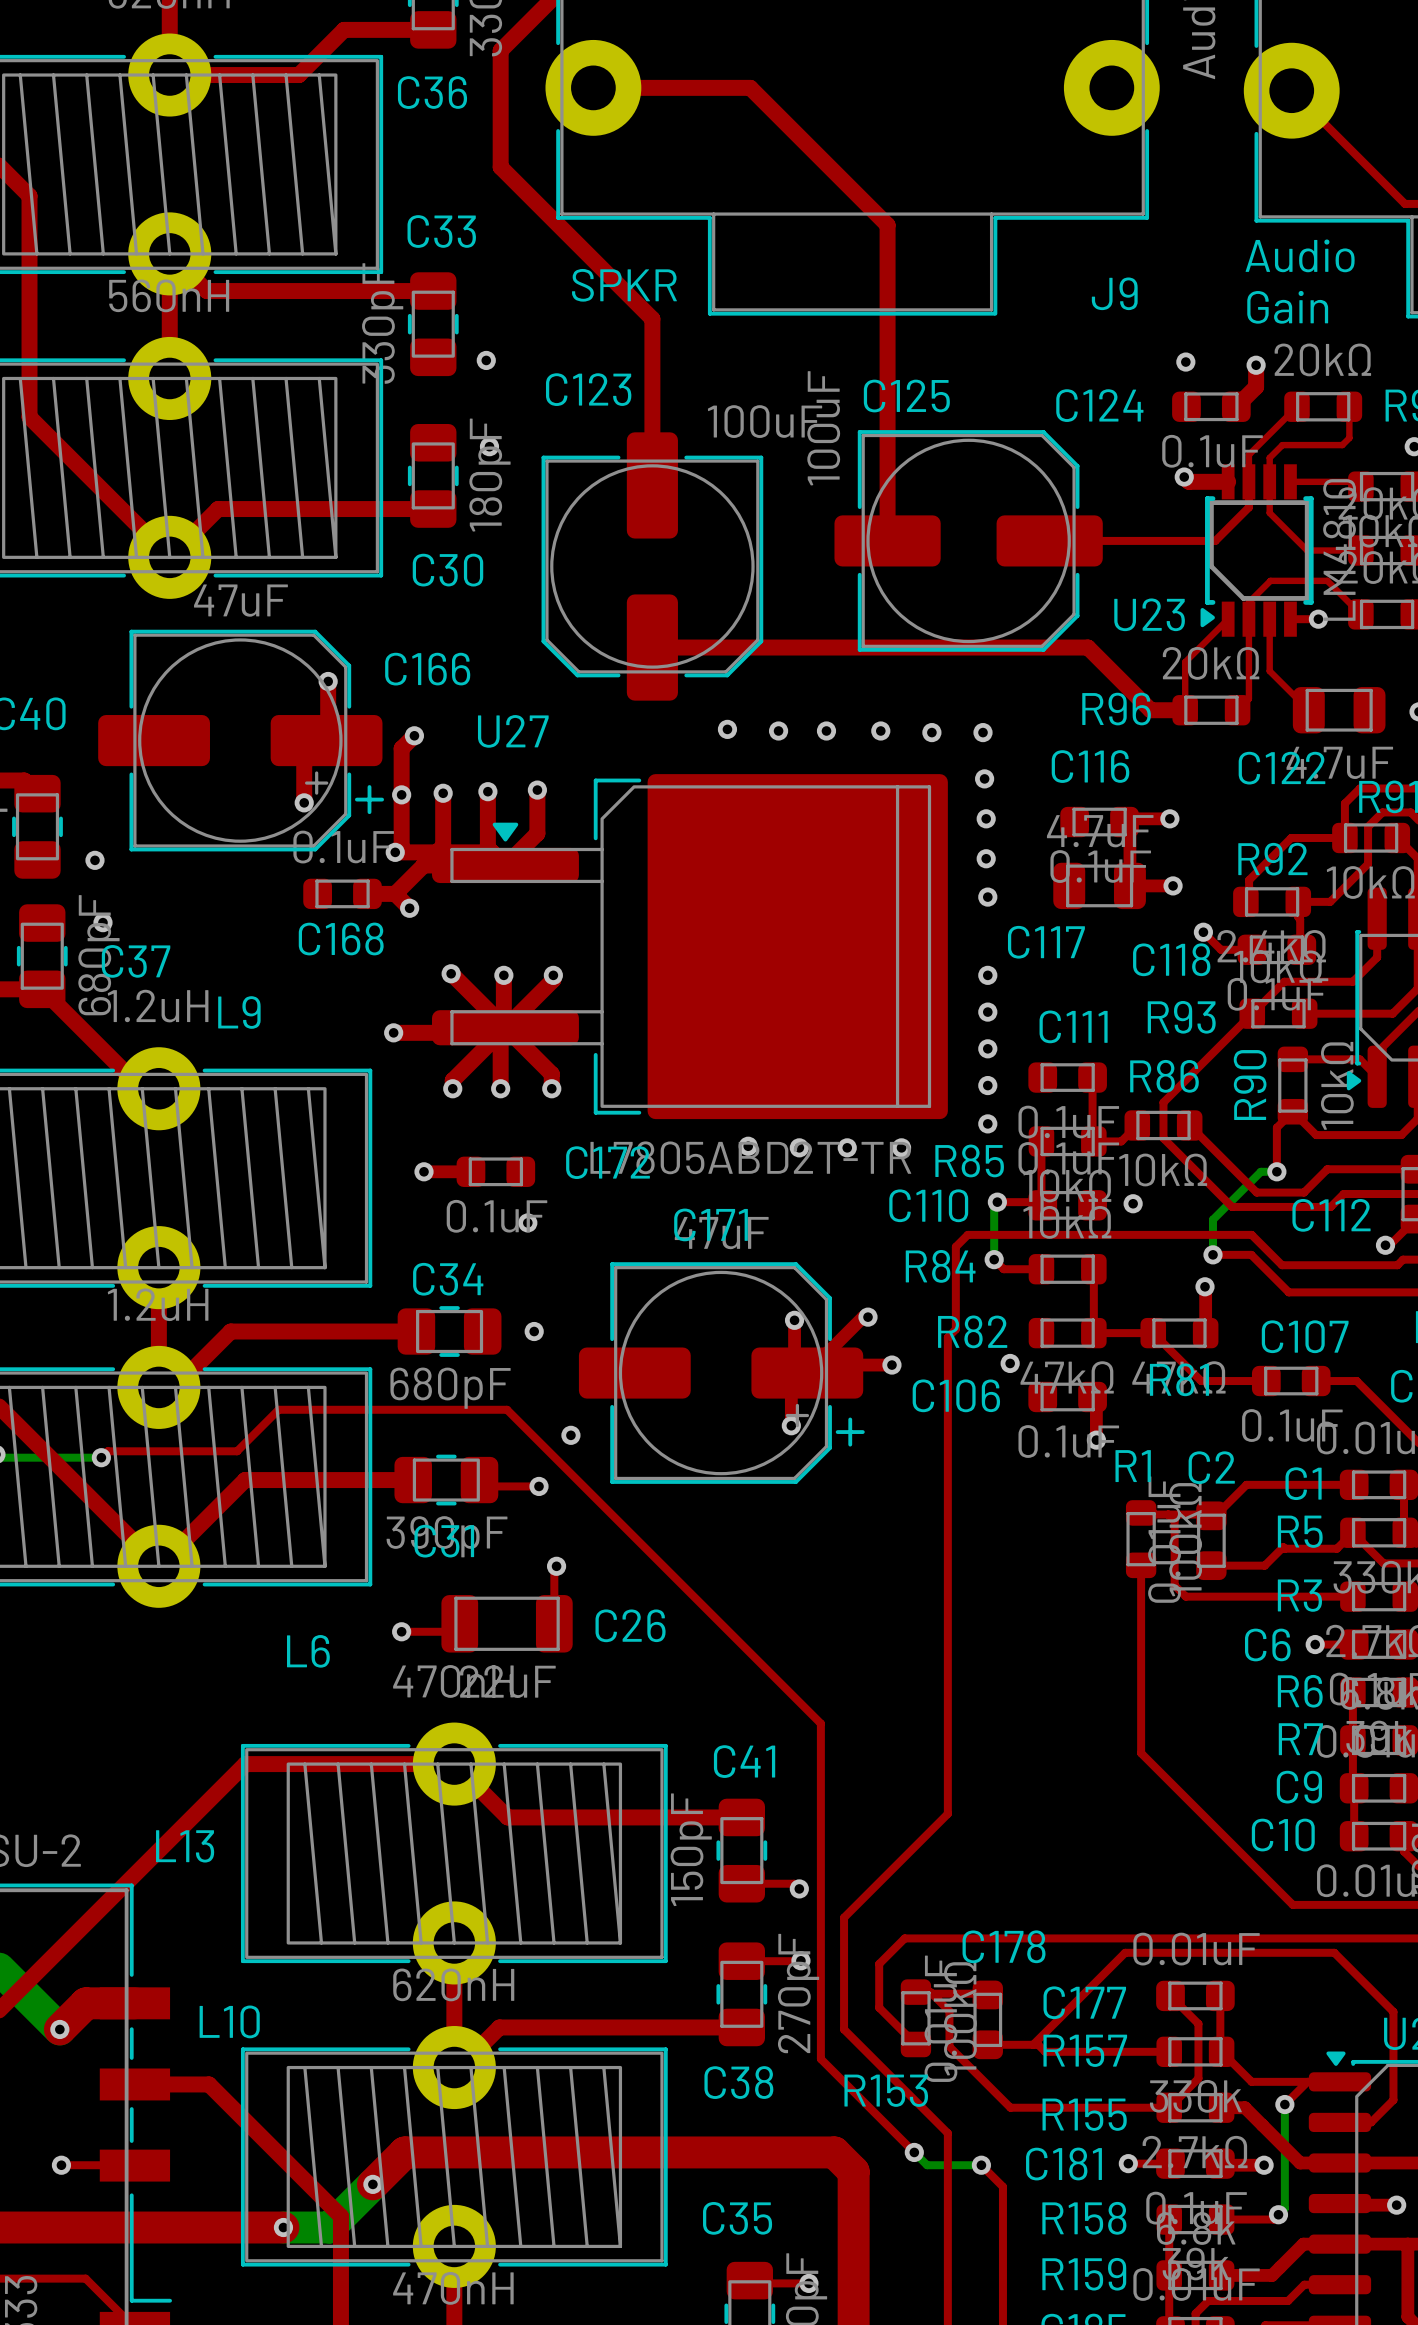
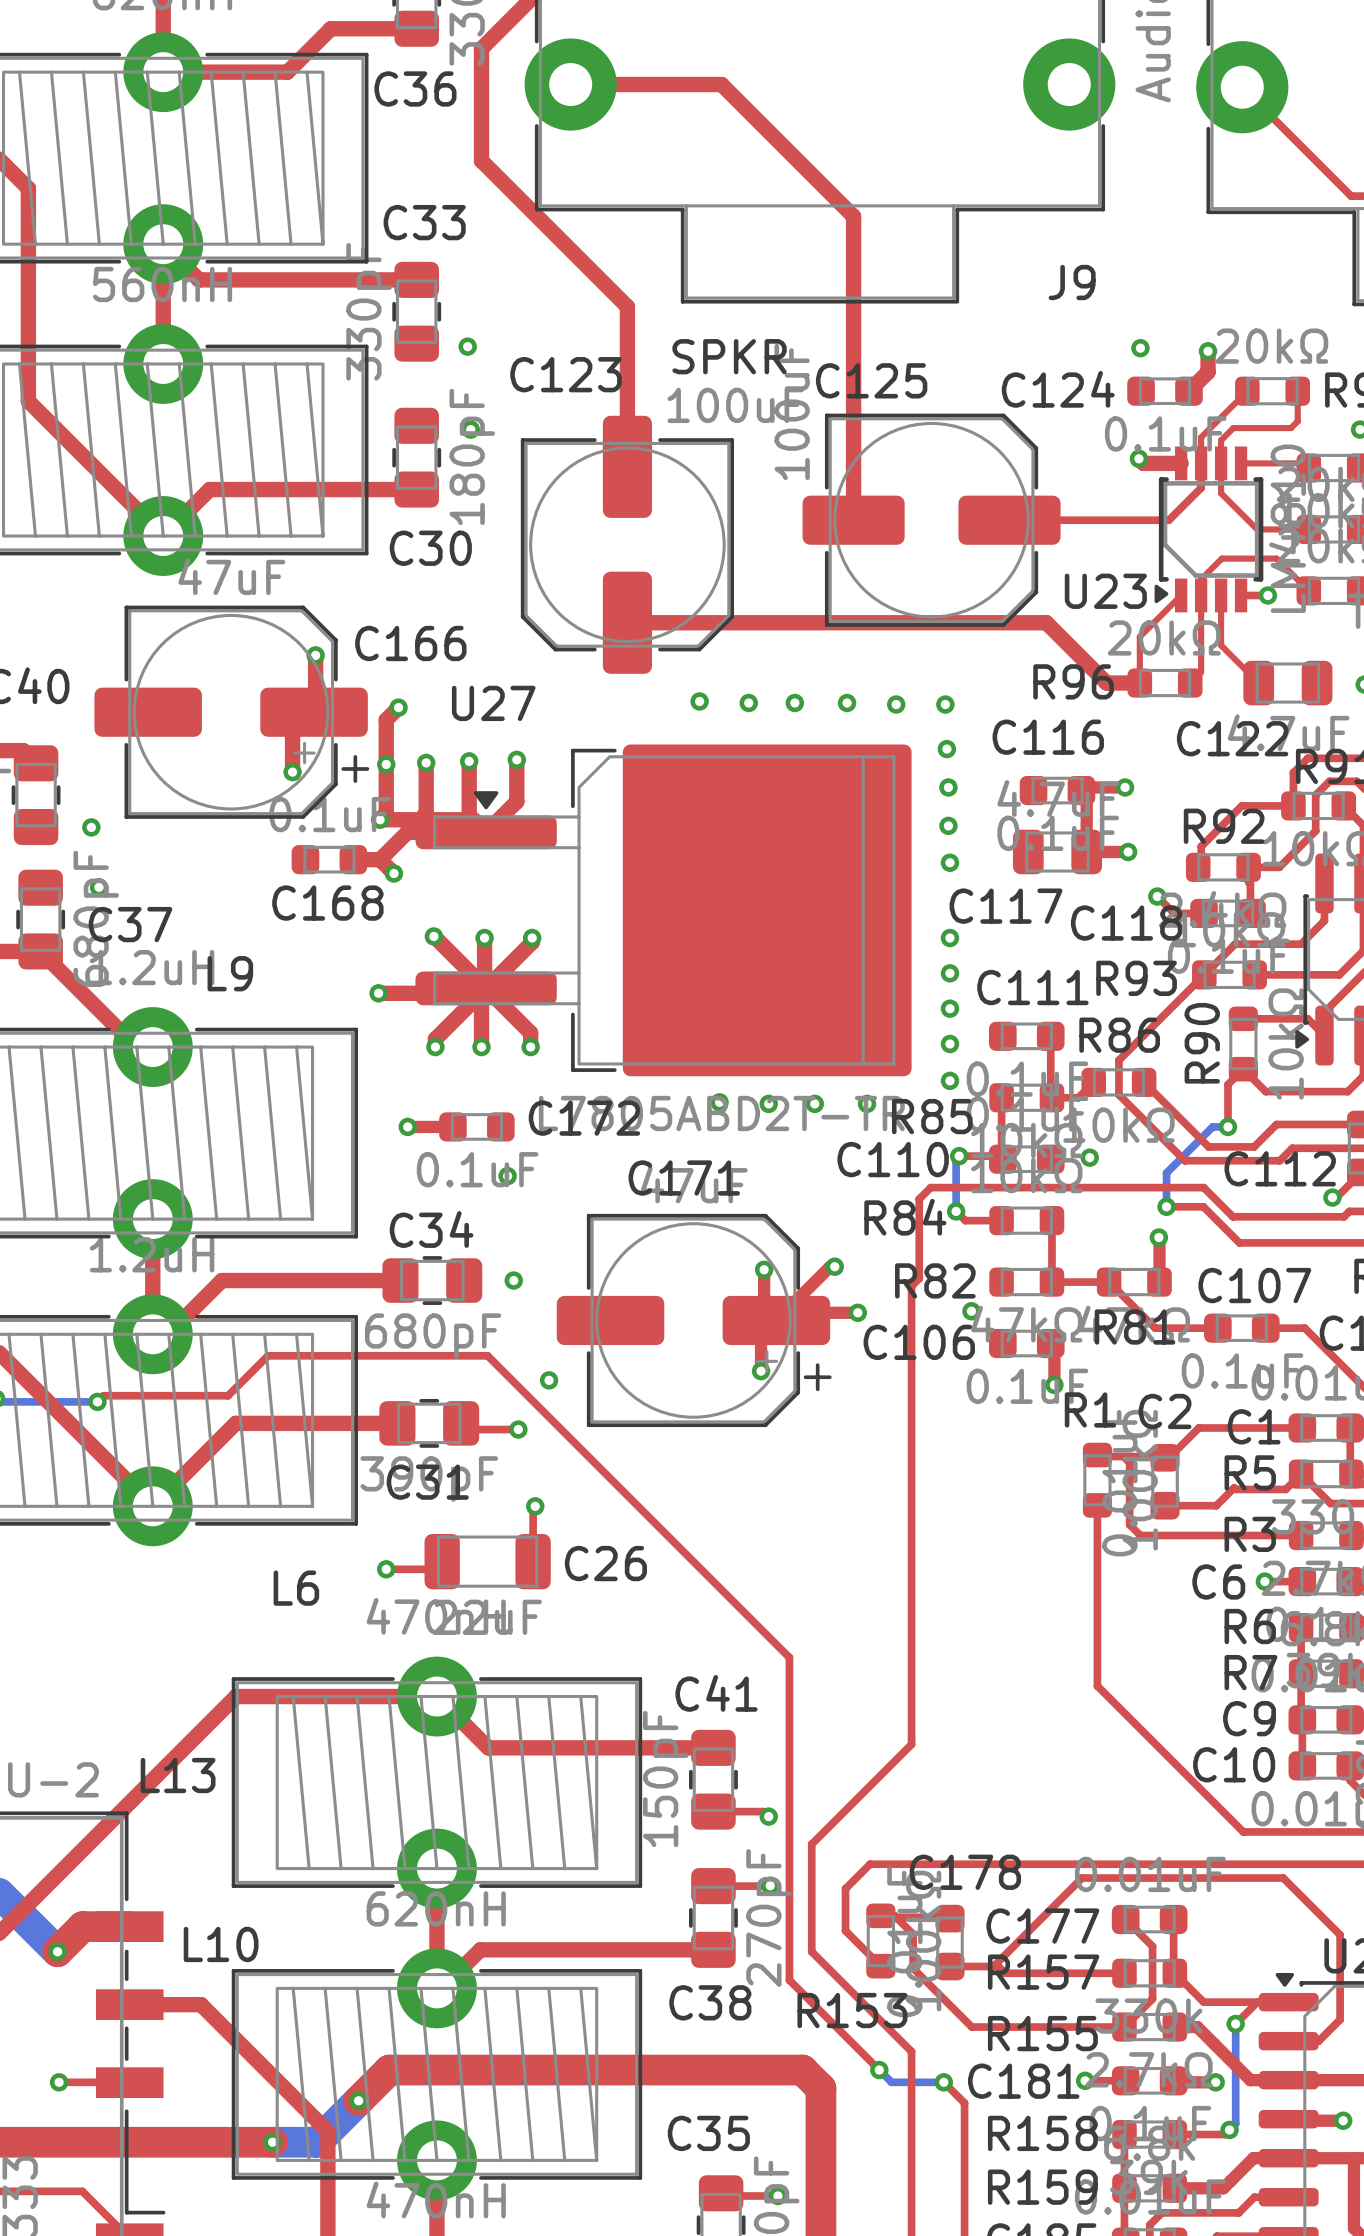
text: Audio (1300, 255) -> none
text position: SPKR (624, 285) -> SPKR (729, 356)
text: Gain (1287, 307) -> none

